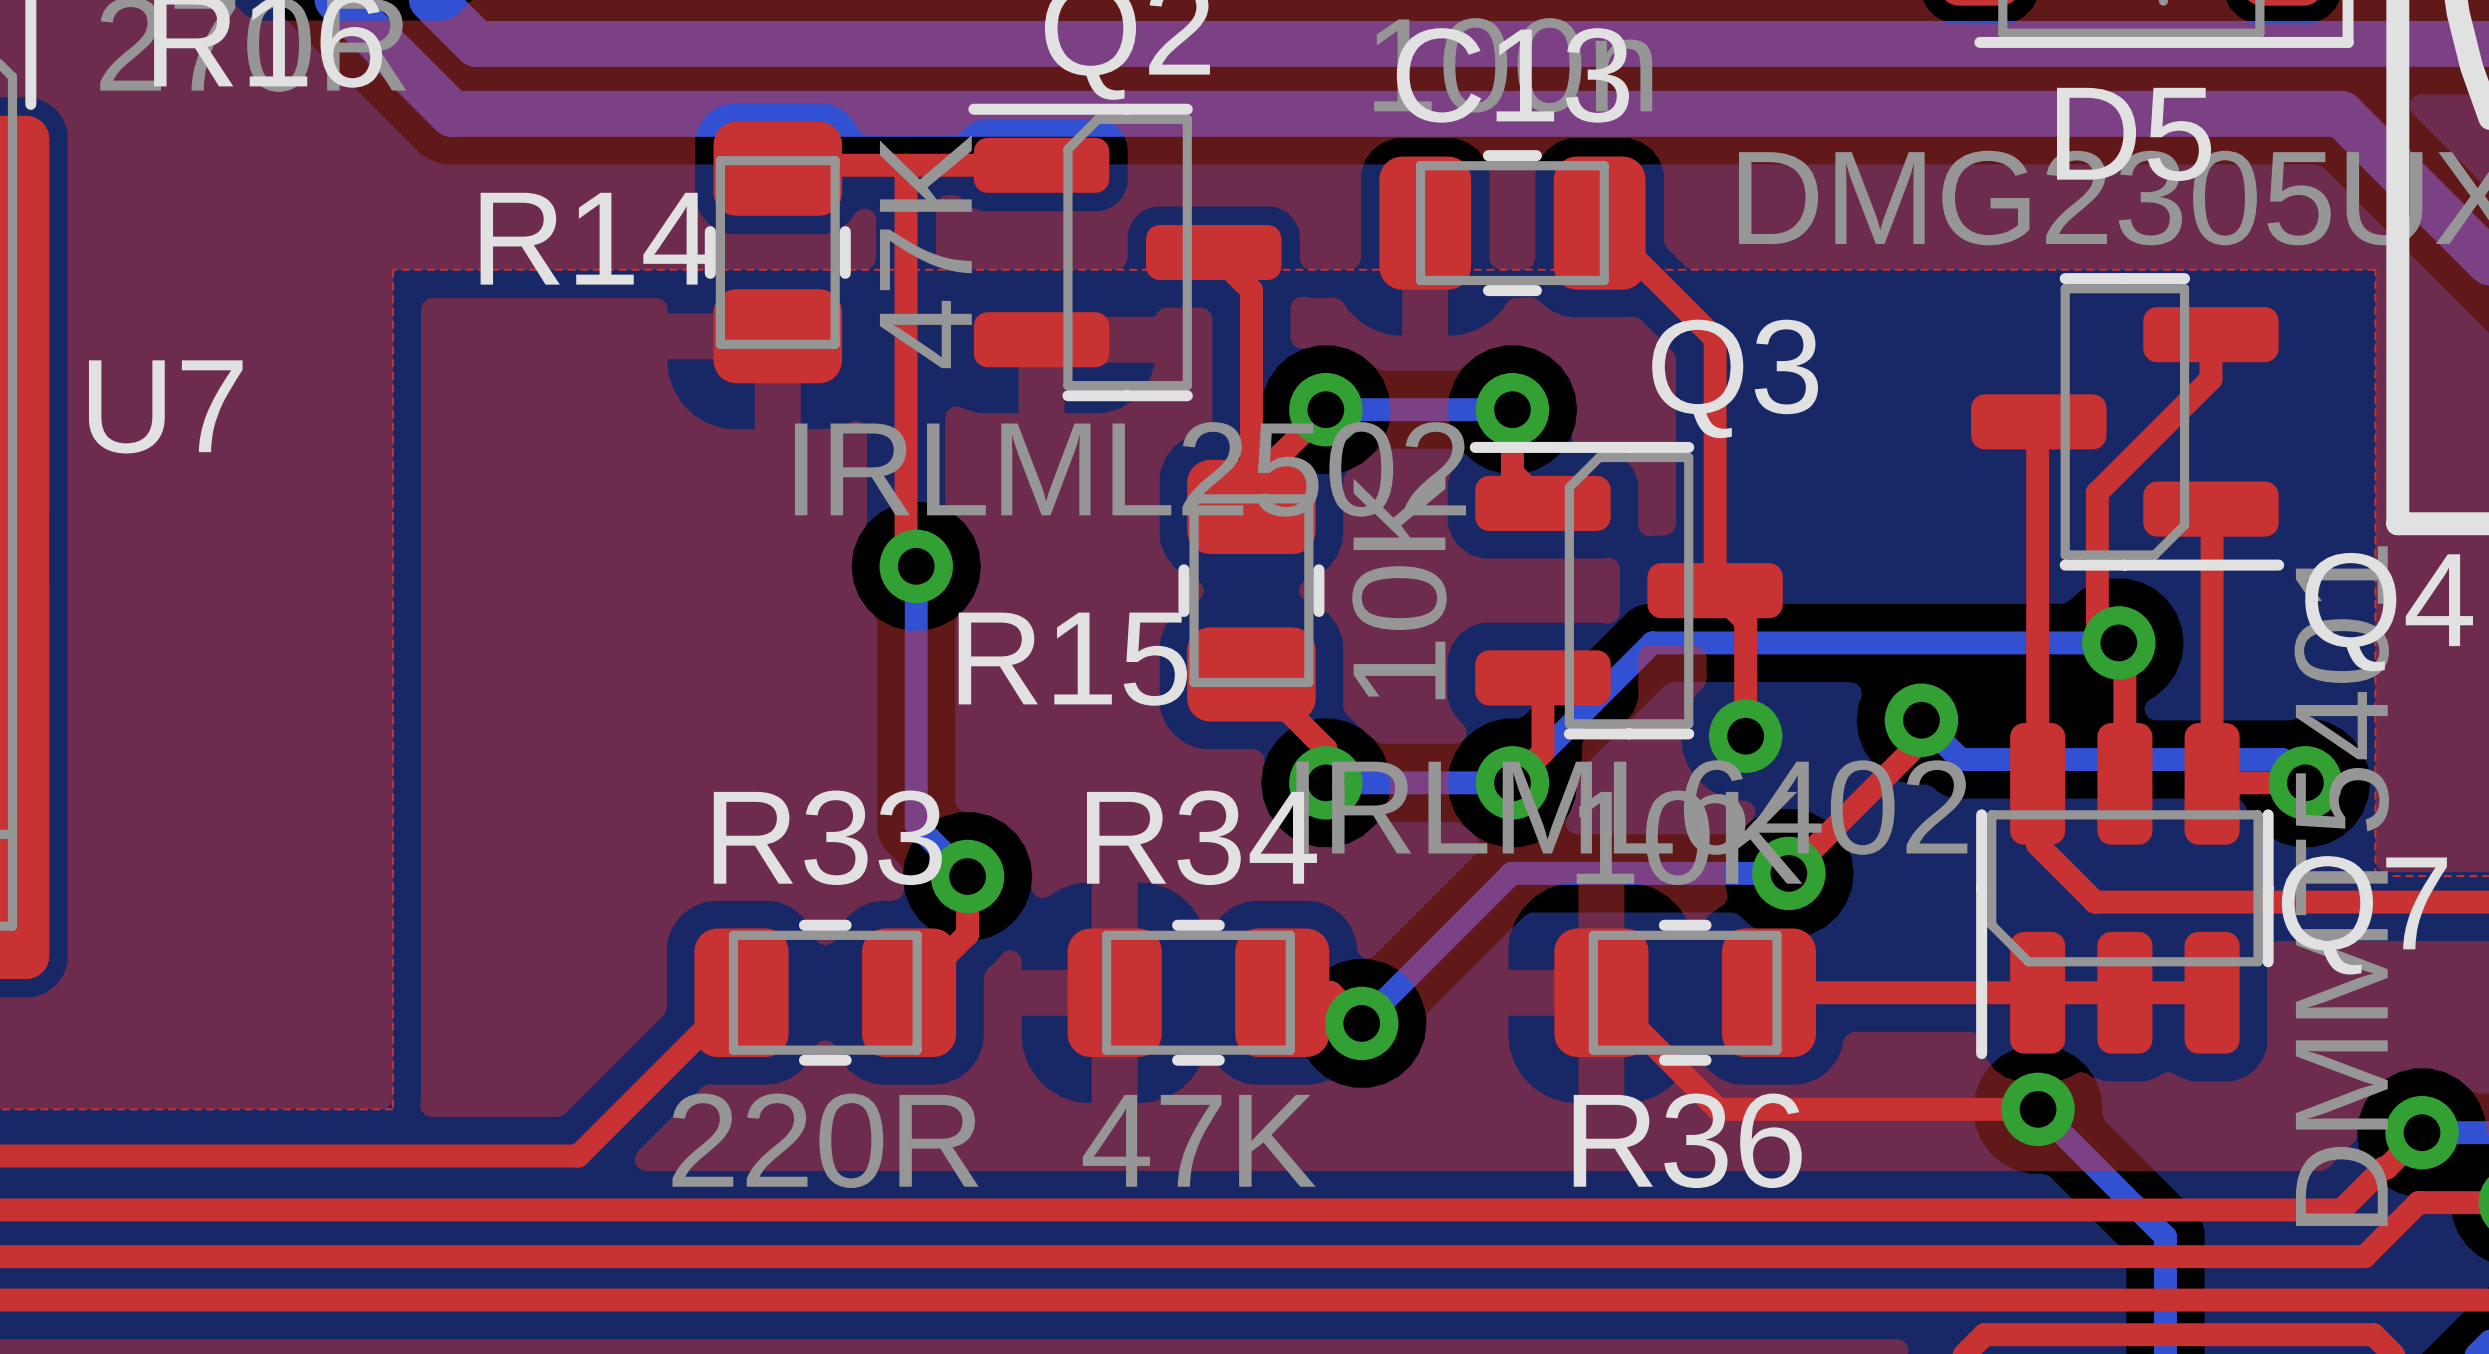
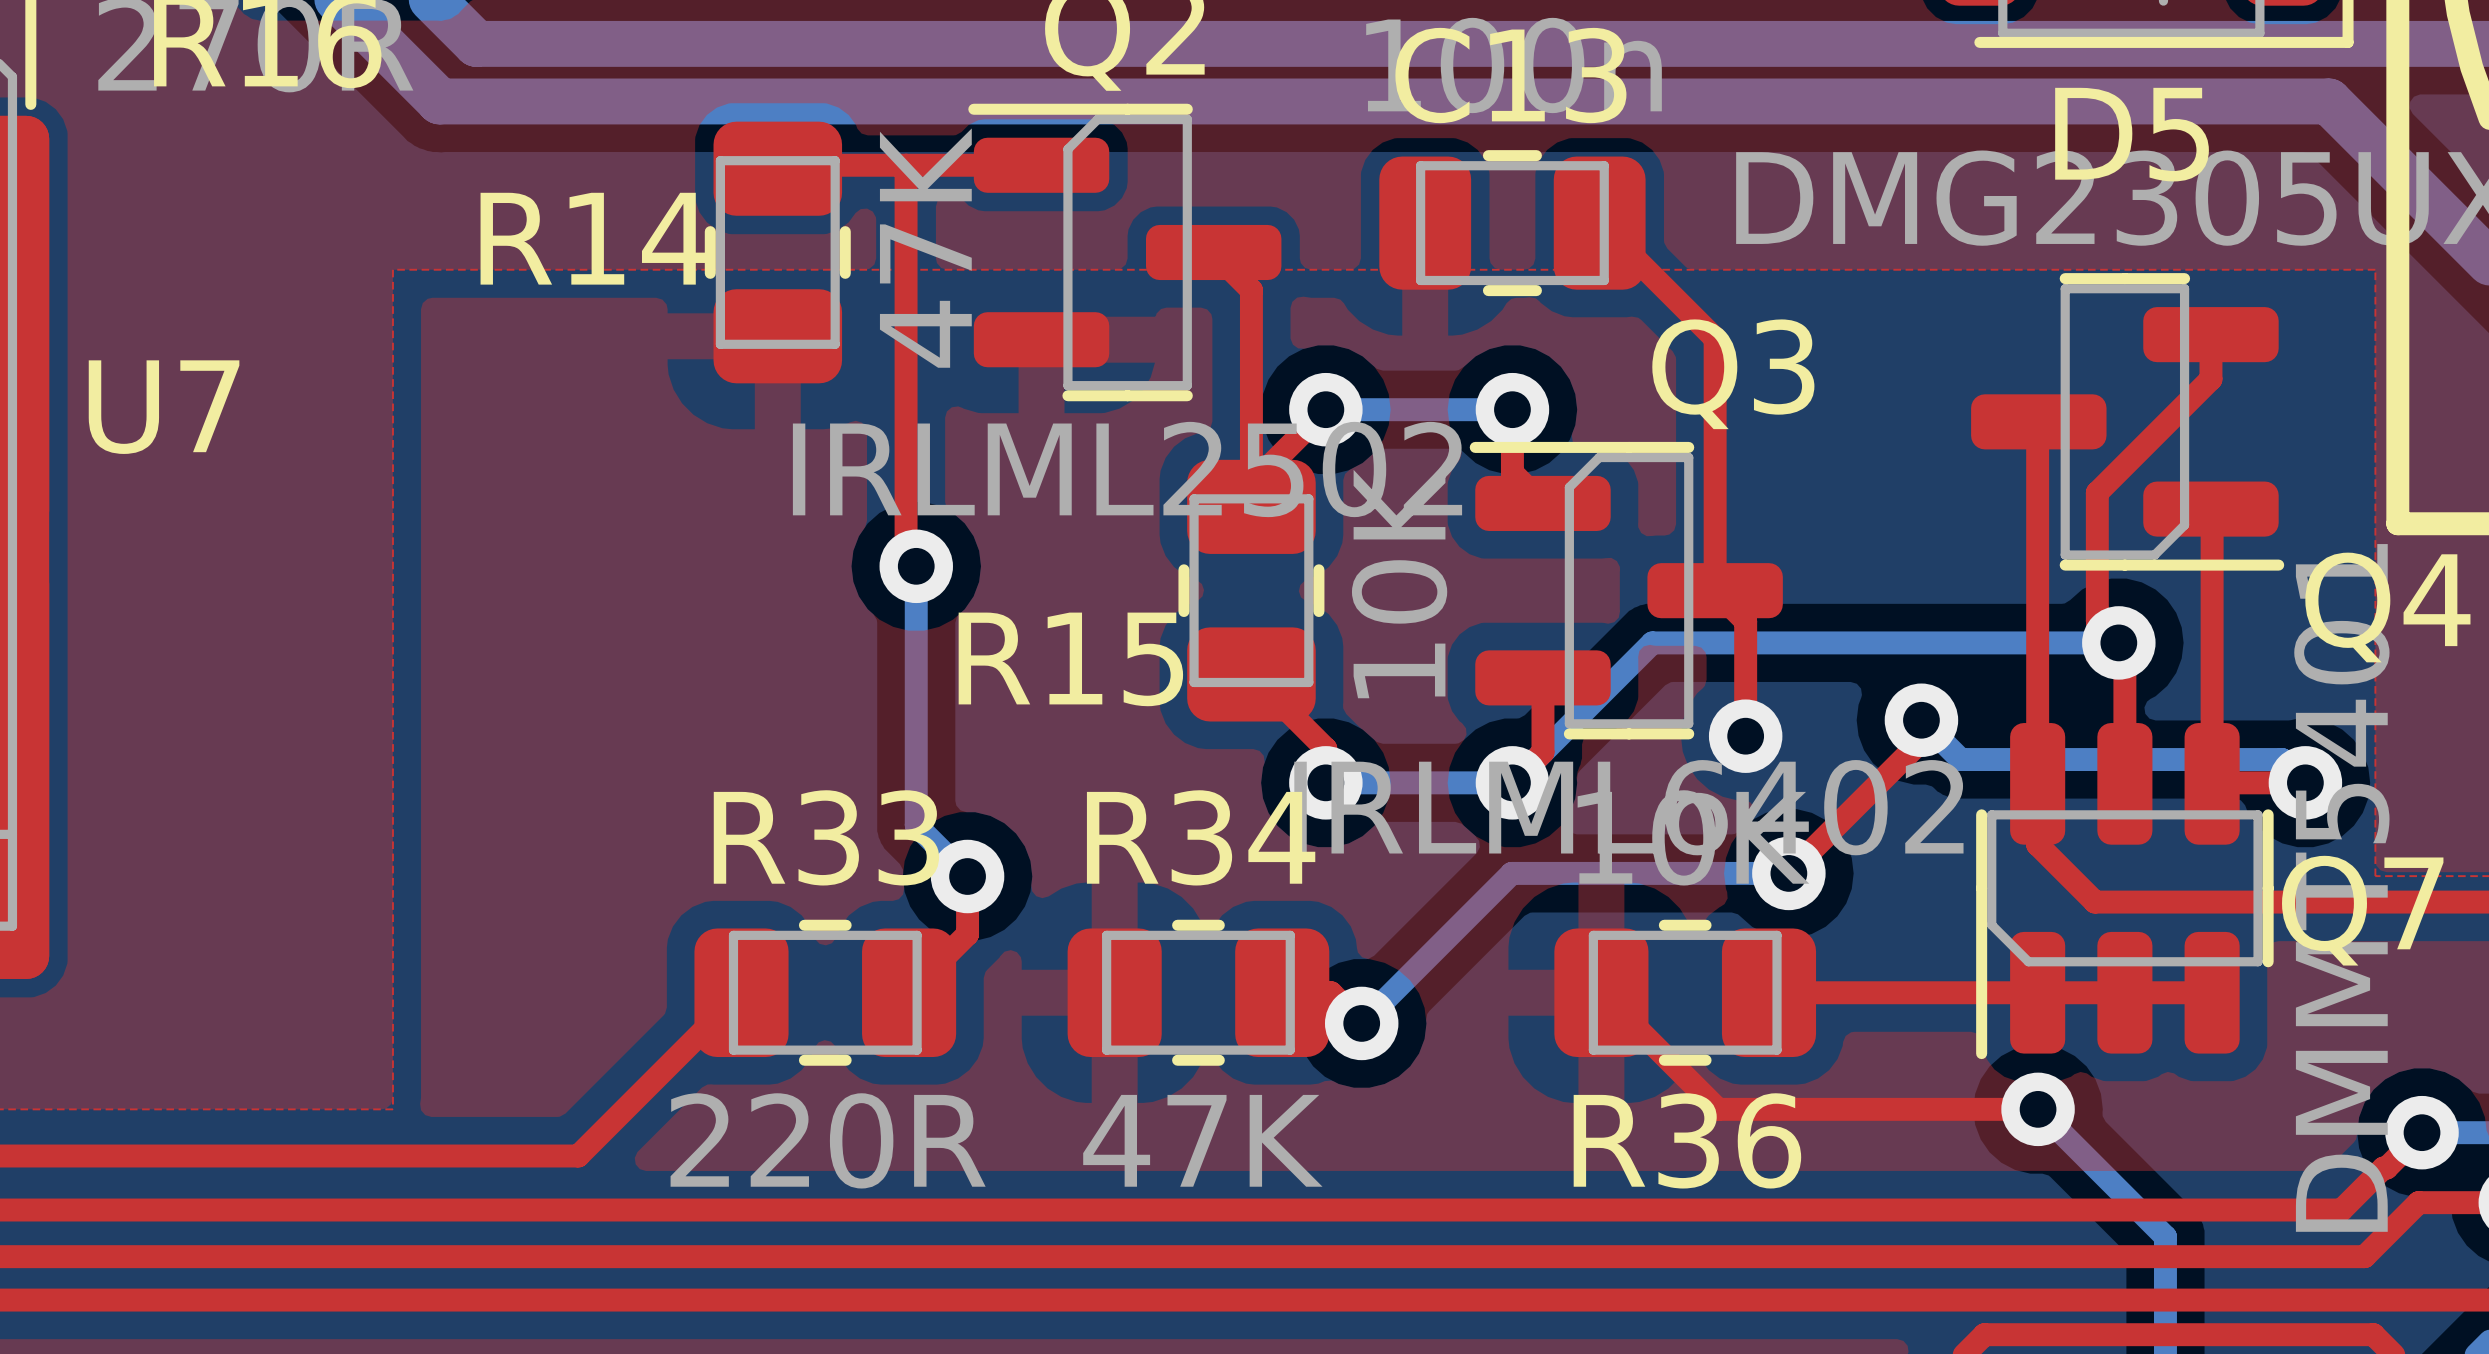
bottom track: (439, 101) (452, 113) (2341, 113) -> (439, 101) (2328, 101) (2341, 113)

